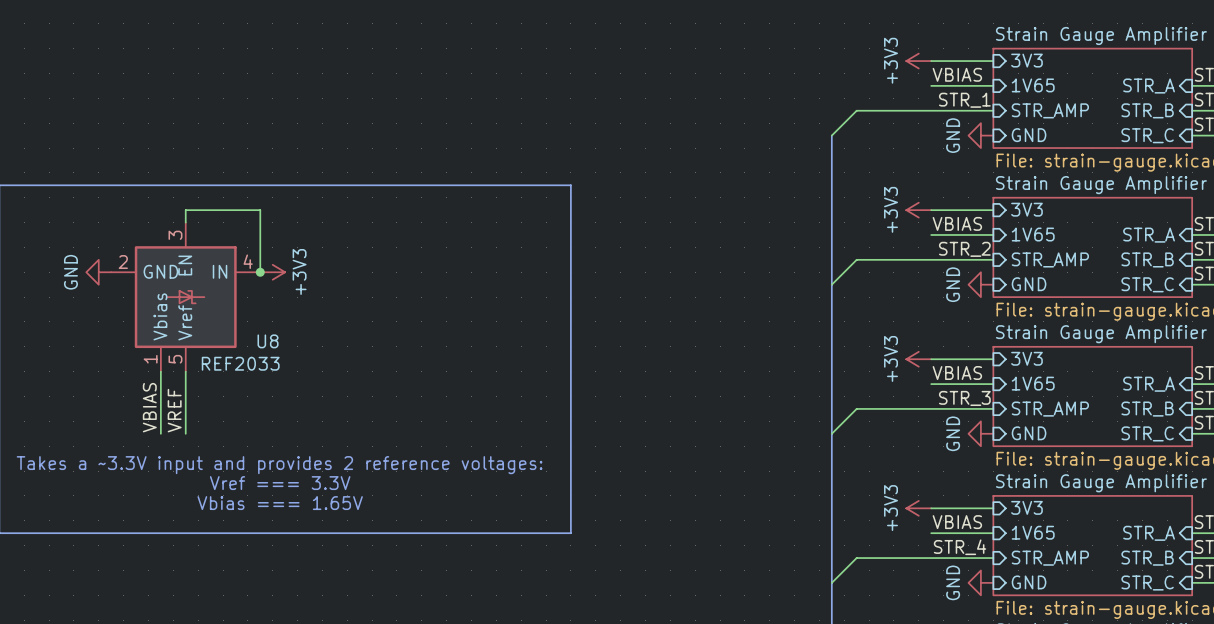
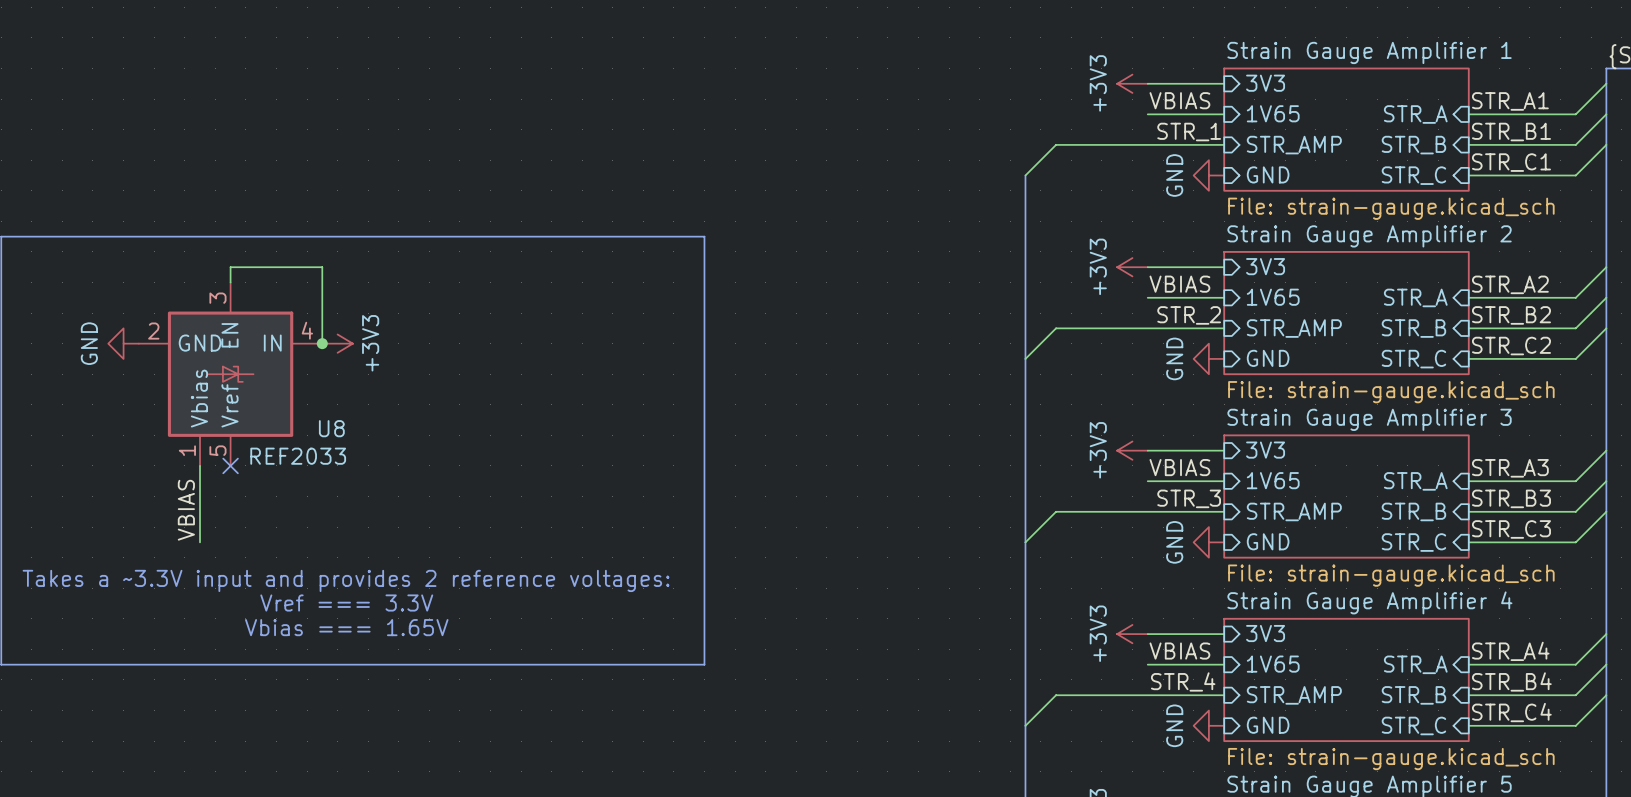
wire: (185, 371) (185, 433) -> none
no-connect mark: none -> (230, 465)
label: VREF (174, 410) -> none

